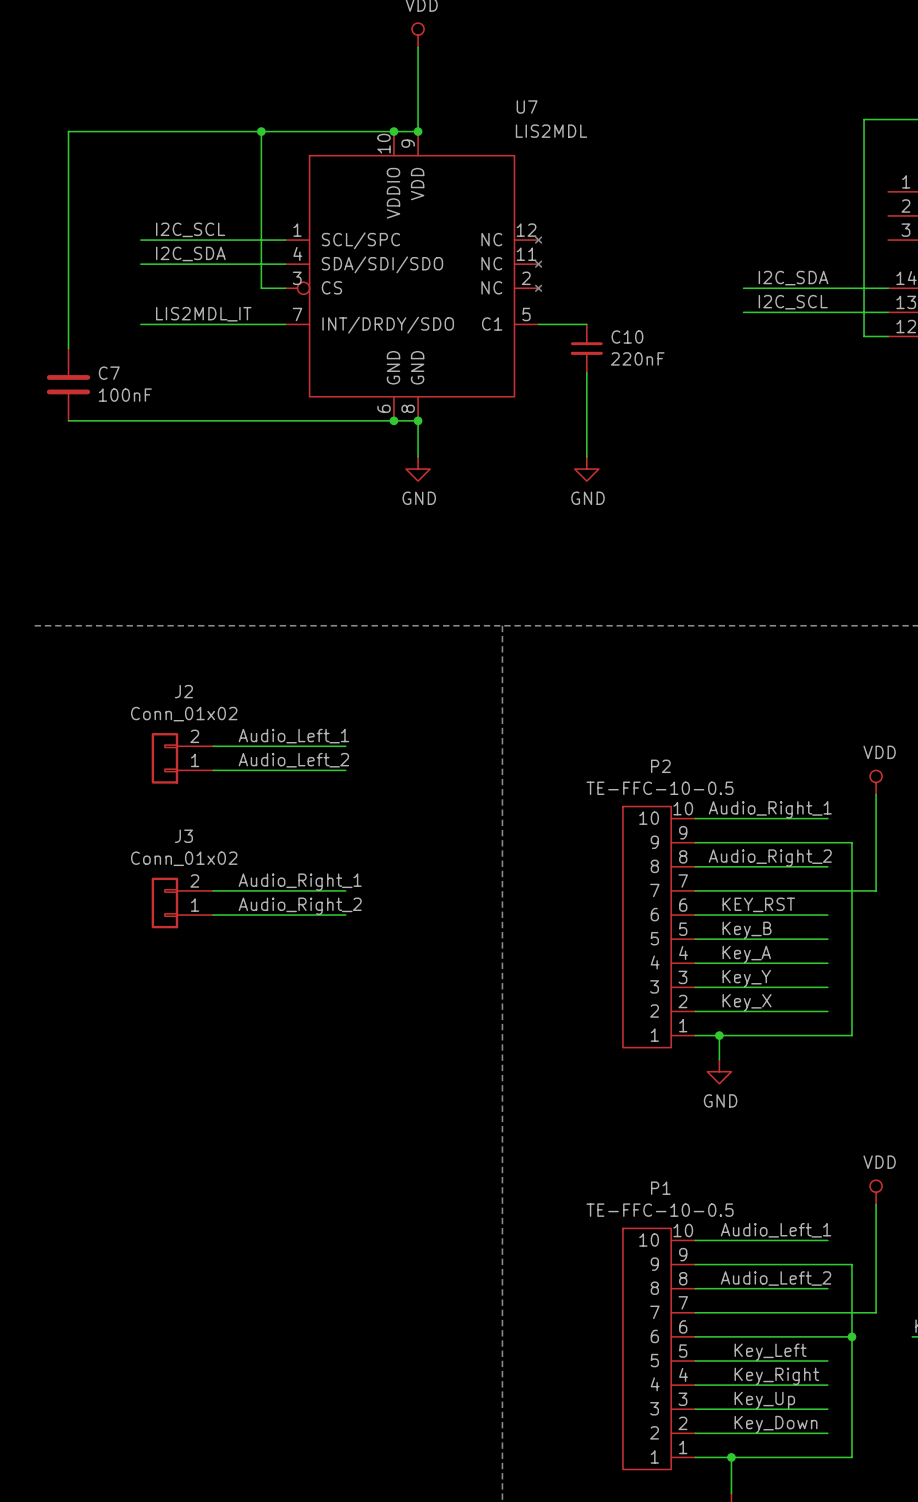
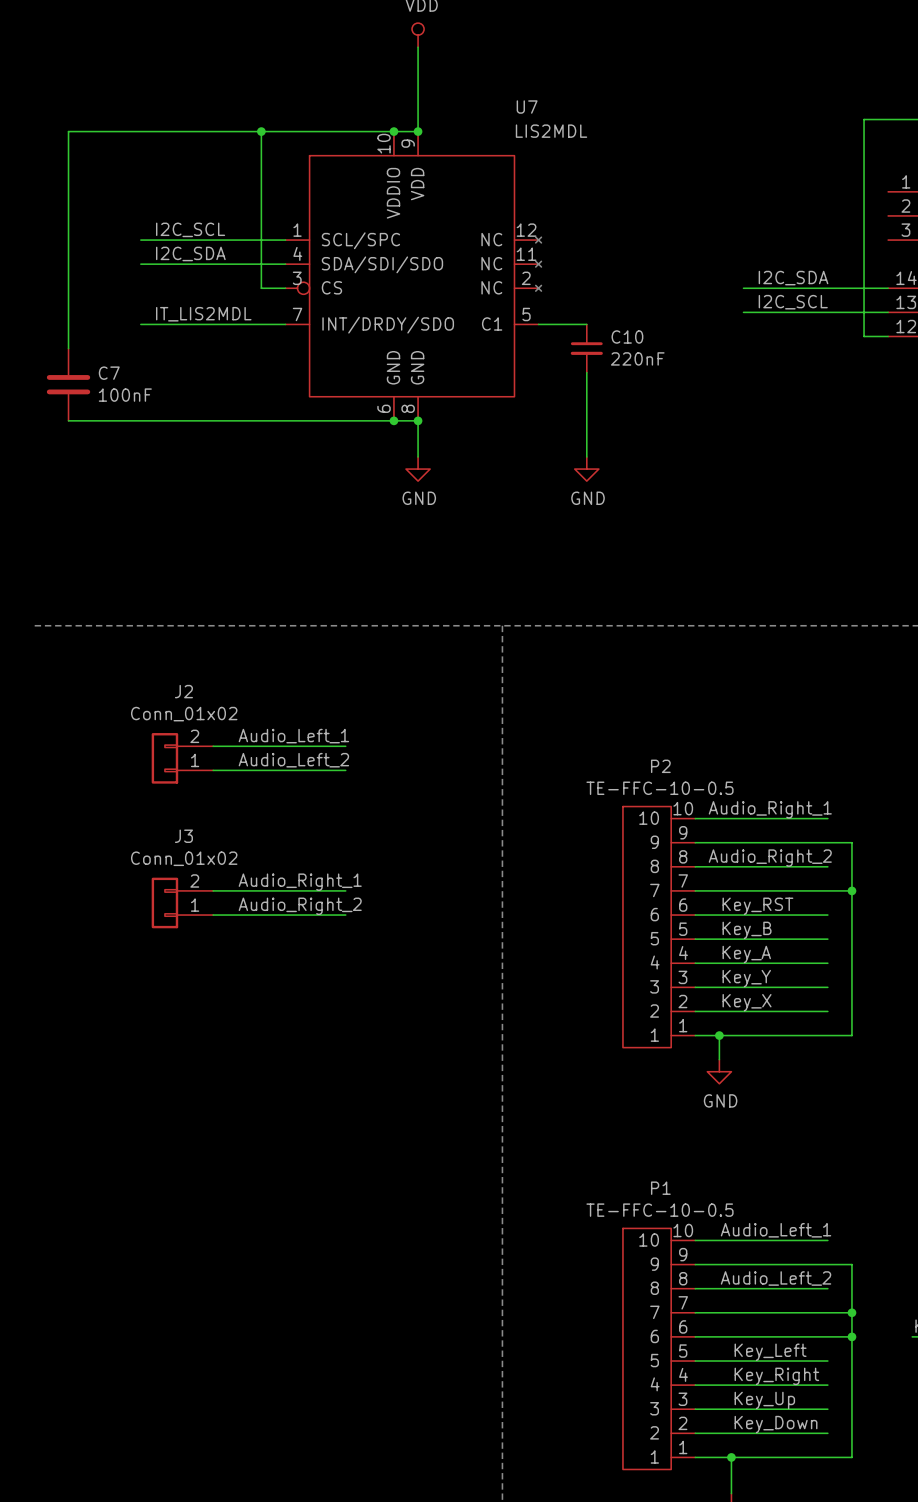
label: LIS2MDL_IT (203, 314) -> IT_LIS2MDL (203, 314)
power symbol: VDD (876, 782) -> none
wire: (876, 794) (876, 890) (851, 890) -> none
junction: none -> (851, 890)
label: KEY_RST (758, 904) -> Key_RST (757, 906)
power symbol: VDD (876, 1192) -> none
wire: (876, 1204) (876, 1312) (851, 1312) -> none
junction: none -> (851, 1312)

